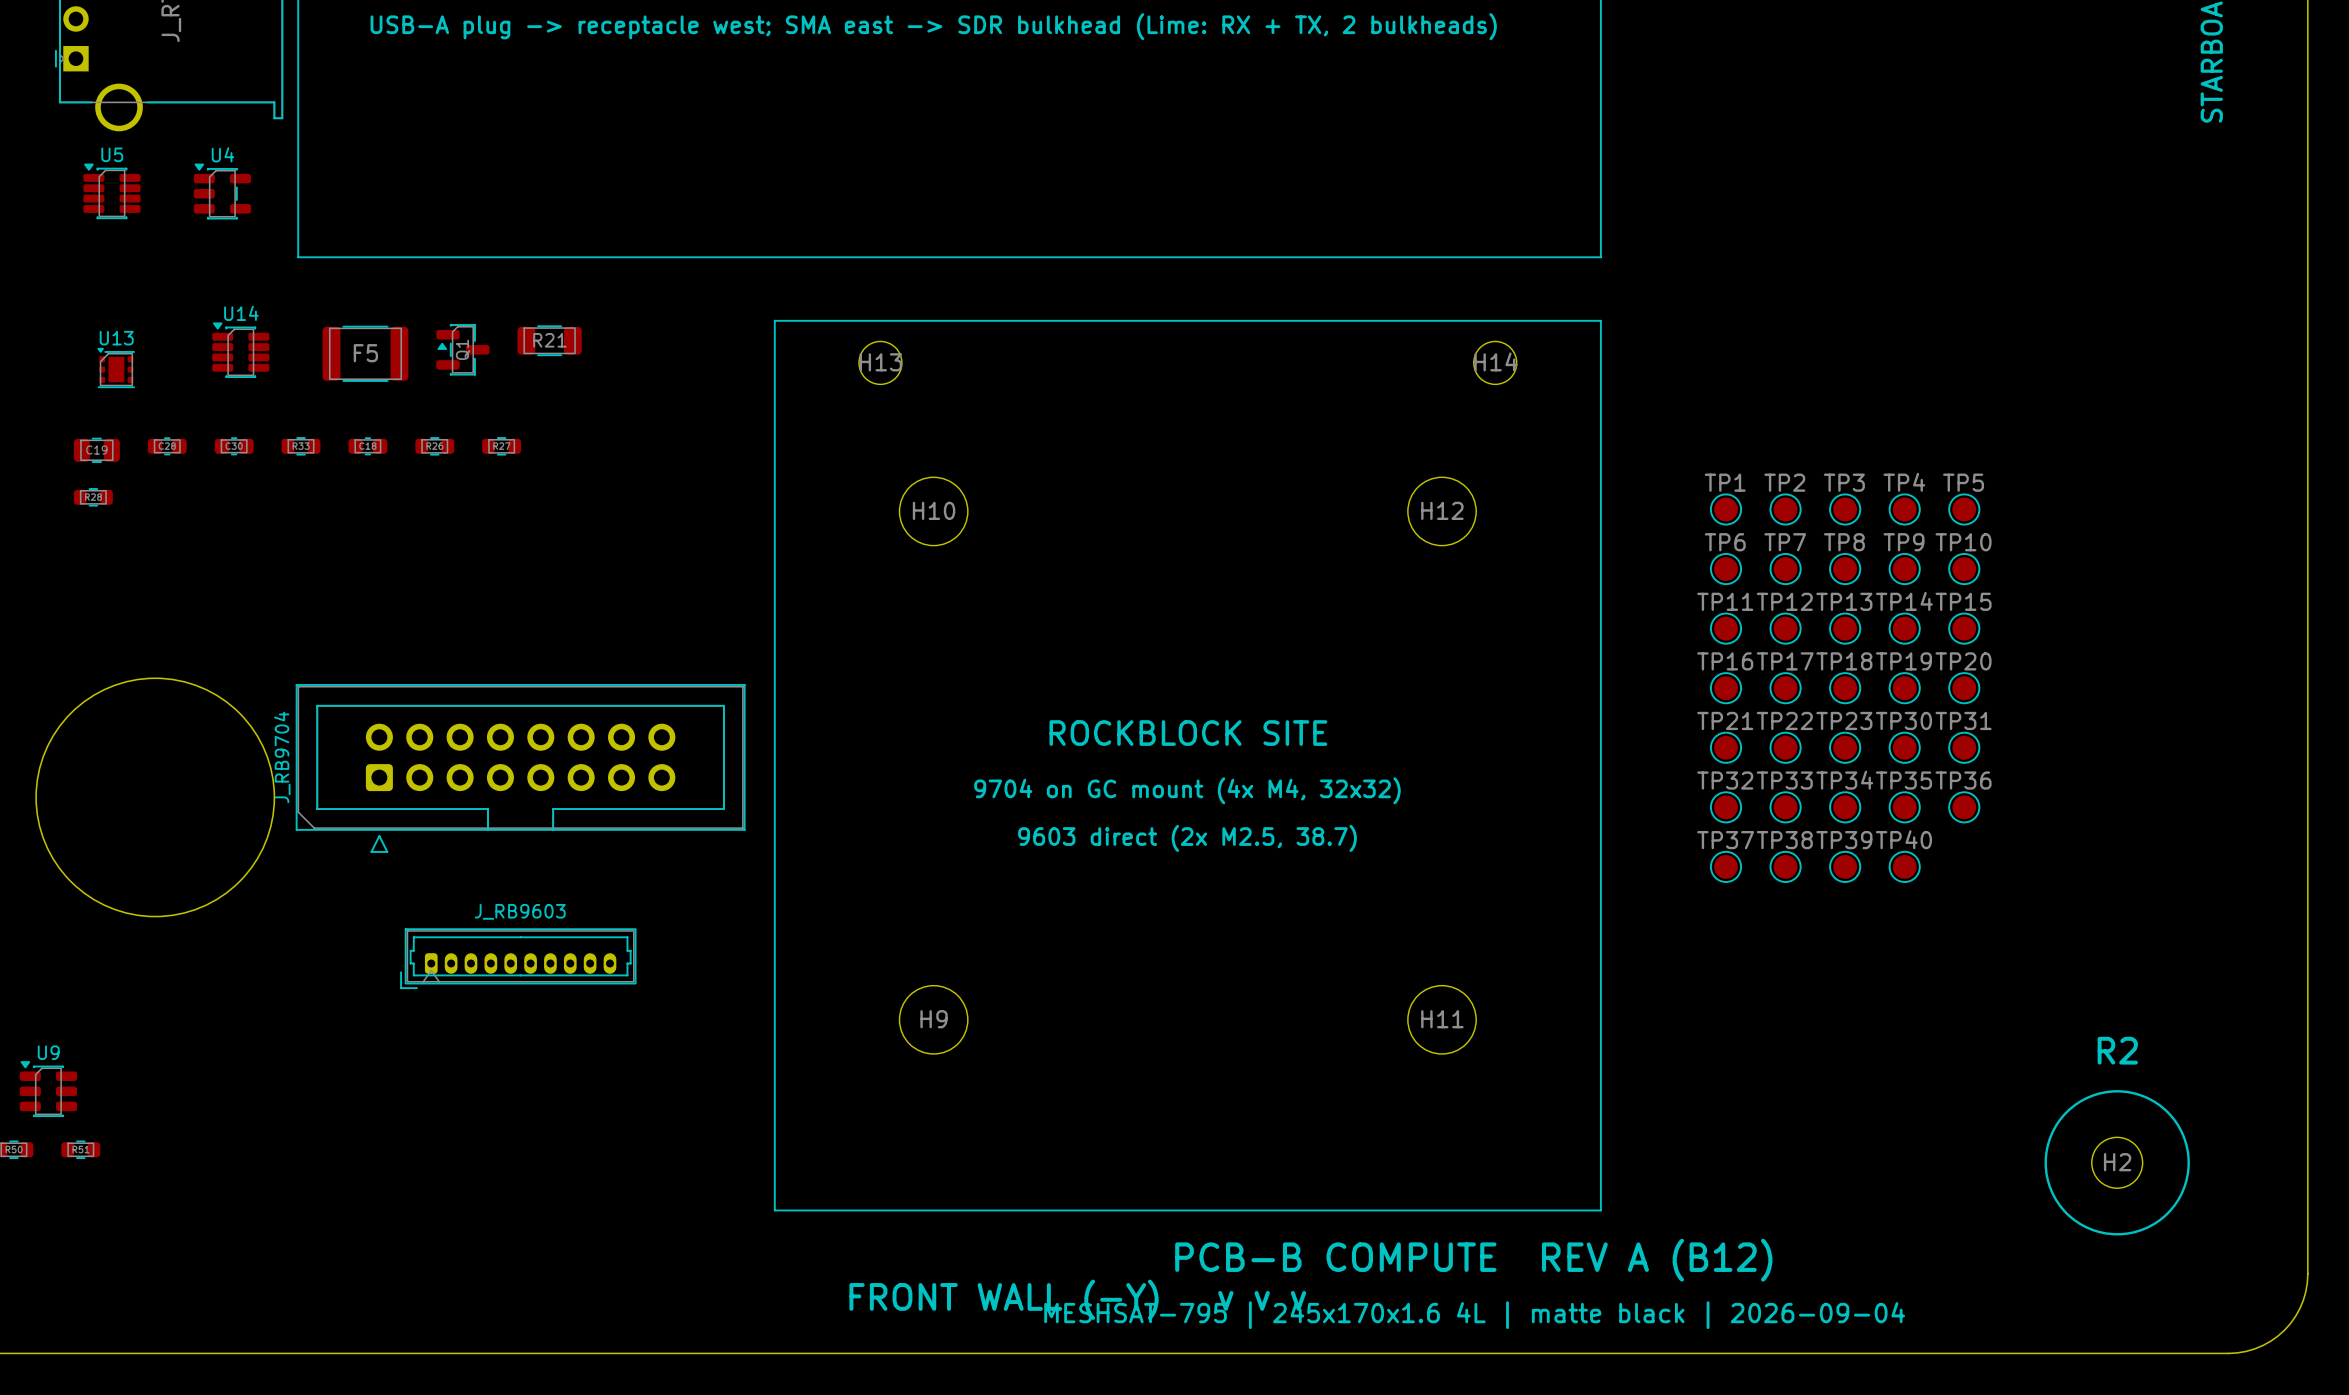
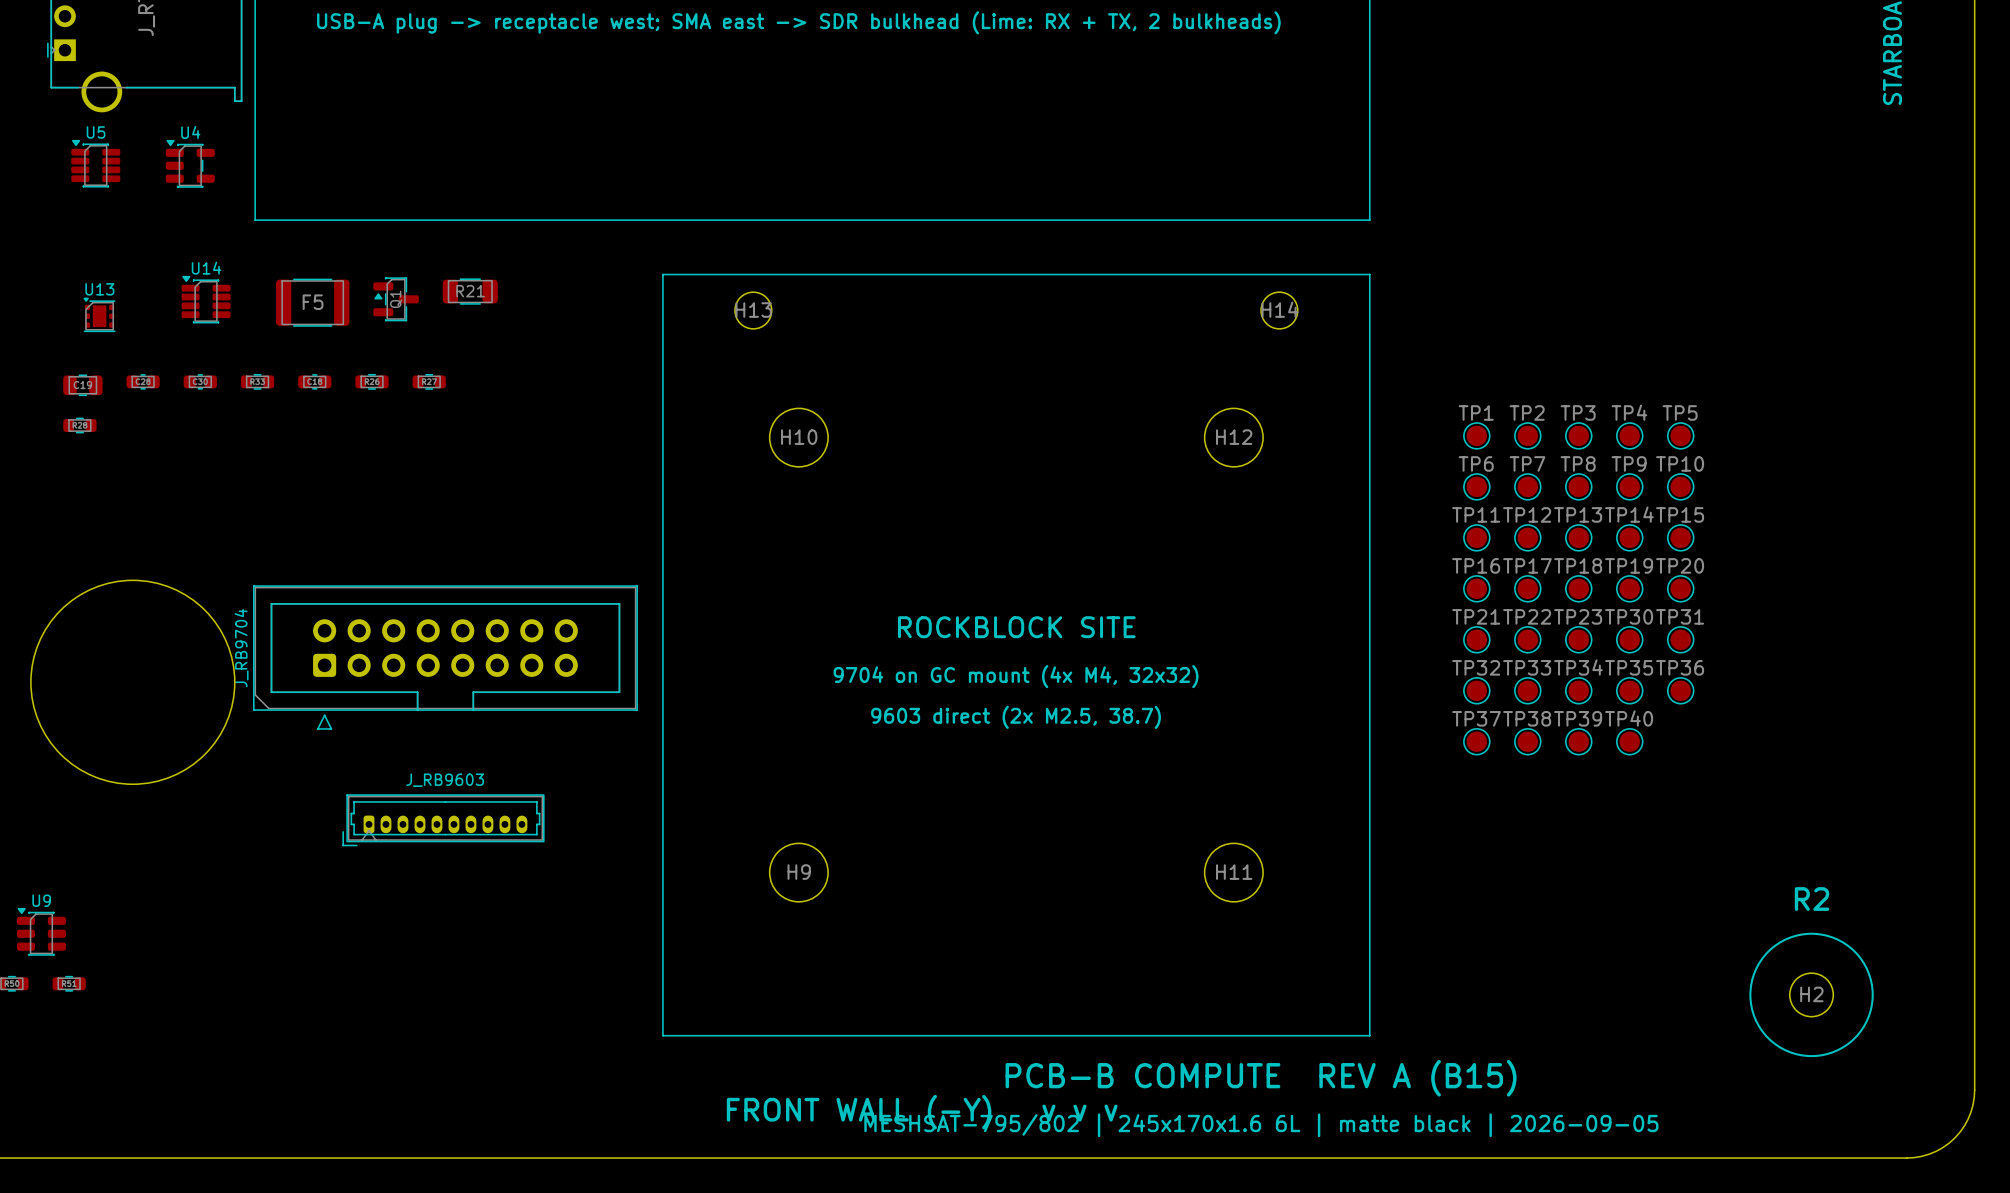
text: PCB-B COMPUTE REV A (B12) (1473, 1260) -> PCB-B COMPUTE REV A (B15) (1261, 1078)
text: MESHSAT-795 | 245x170x1.6 4L | matte black | 2026-09-04 (1474, 1315) -> MESHSAT-795/802 | 245x170x1.6 6L | matte black | 2026-09-05 (1261, 1125)

